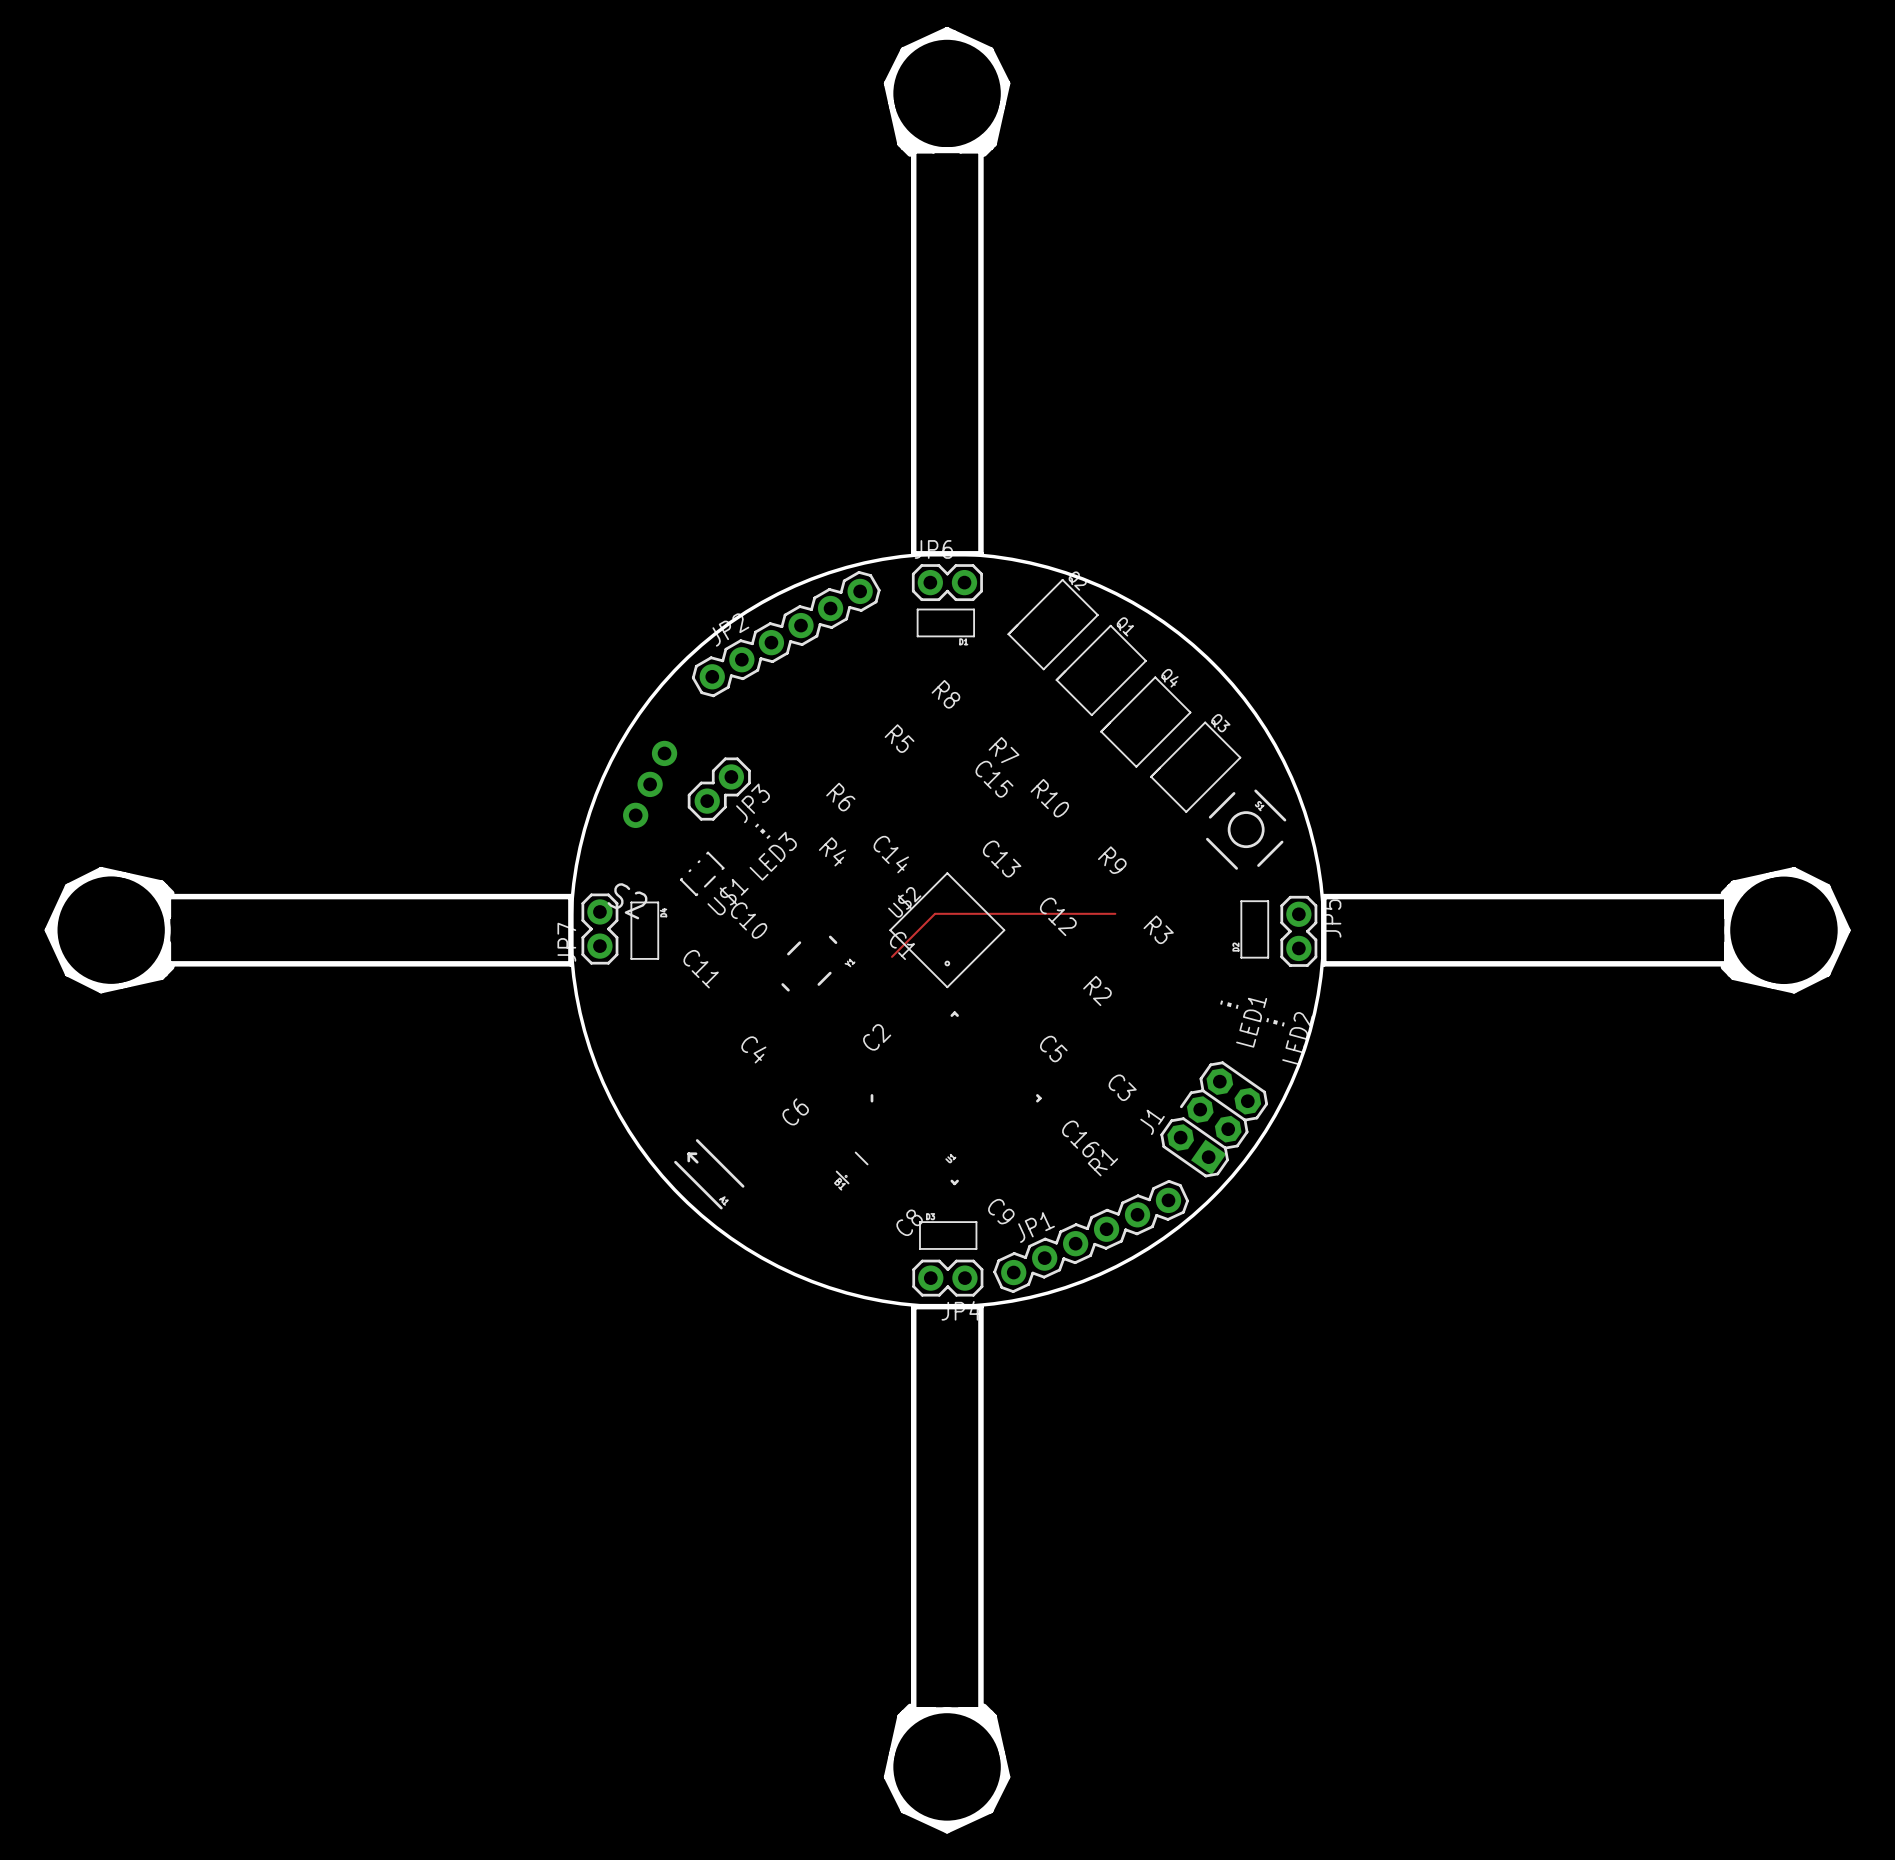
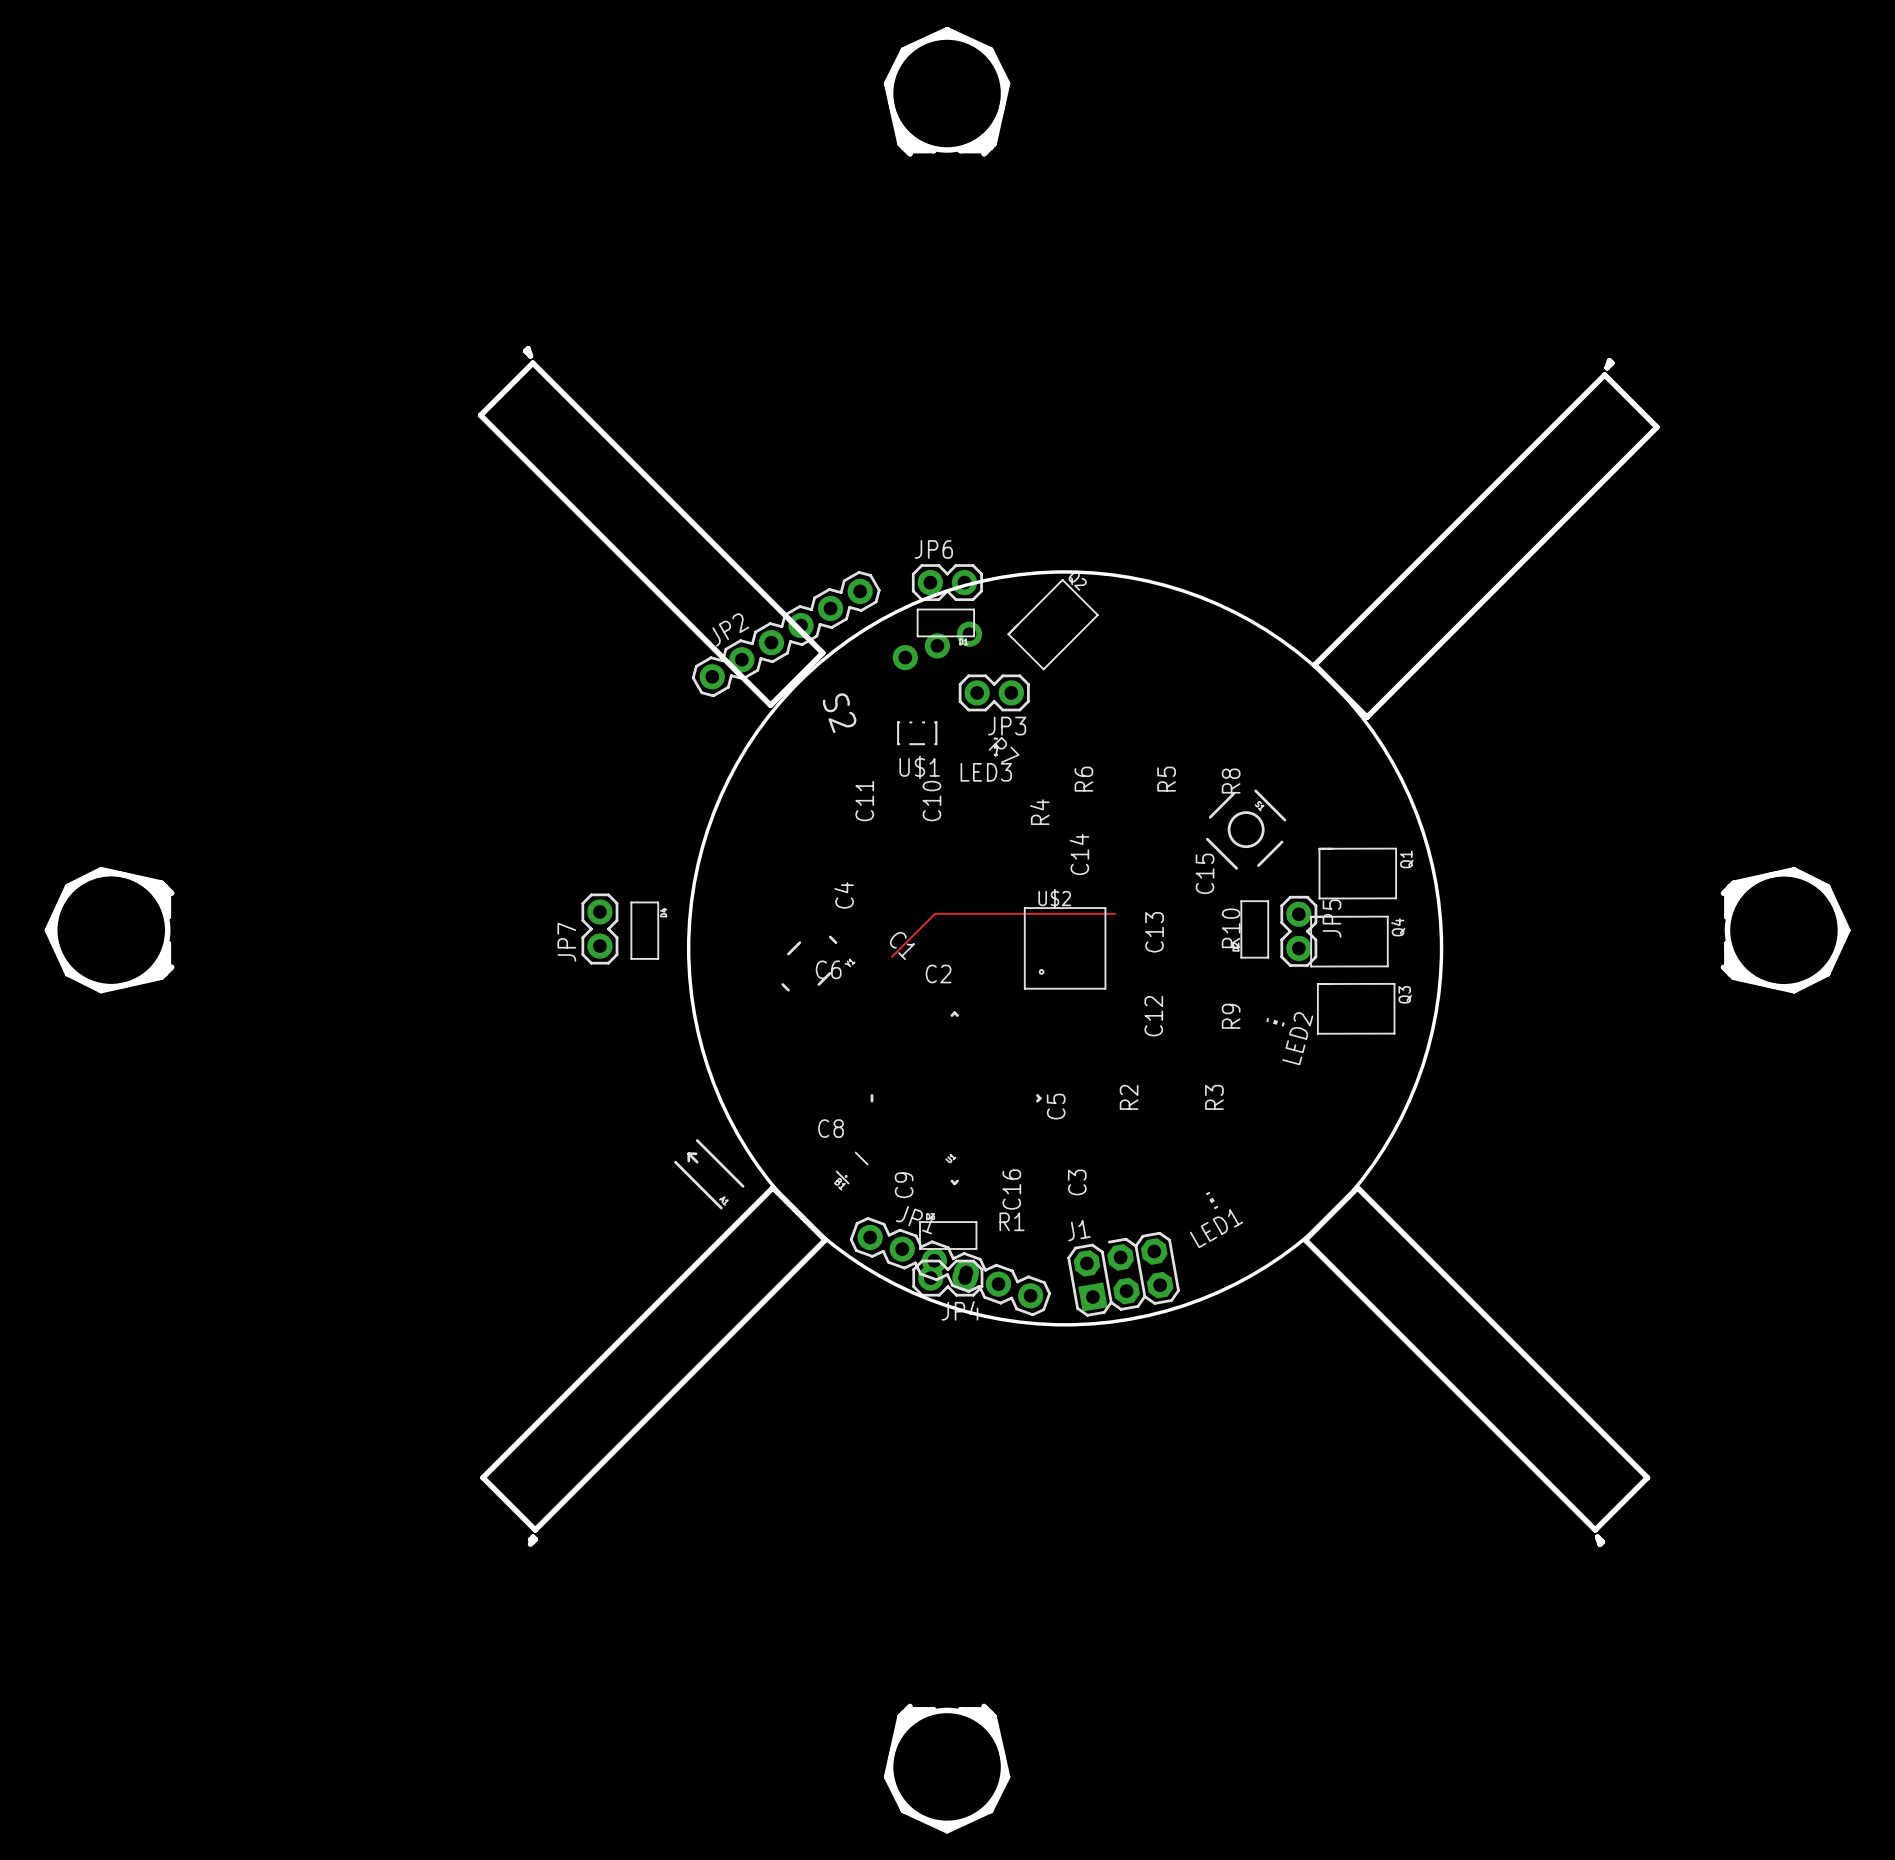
board edge: (913, 150) (913, 553) (980, 553) (980, 150) (913, 150) -> none
board edge: none -> (528, 348) (525, 351) (530, 355) (528, 348)
board edge: none -> (1609, 360) (1611, 363) (1607, 367) (1609, 360)
board edge: none -> (532, 363) (822, 653) (770, 705) (480, 415) (532, 363)
board edge: none -> (1604, 374) (1314, 664) (1367, 717) (1657, 427) (1604, 374)
Q1 rotation: 0° (1101, 670) -> 45° clockwise (1357, 873)
Q1 position: (1101, 670) -> (1357, 873)
R8 position: (945, 694) -> (1231, 781)
R8 name rotation: 0° (945, 694) -> 135° counterclockwise (1231, 781)
Q4 rotation: 0° (1145, 722) -> 45° clockwise (1349, 941)
Q4 position: (1145, 722) -> (1349, 941)
R5 position: (899, 738) -> (1166, 779)
R5 name rotation: 0° (899, 738) -> 135° counterclockwise (1166, 779)
Q3 rotation: 0° (1195, 767) -> 45° clockwise (1356, 1008)
Q3 position: (1195, 767) -> (1356, 1008)
C15 position: (994, 779) -> (1205, 873)
C15 name rotation: 0° (994, 779) -> 135° counterclockwise (1205, 873)
S2 rotation: 0° (650, 784) -> 45° clockwise (937, 645)
S2 position: (650, 784) -> (937, 645)
JP3 rotation: 0° (719, 789) -> 45° clockwise (994, 692)
JP3 position: (719, 789) -> (994, 692)
R6 position: (840, 797) -> (1083, 779)
R6 name rotation: 0° (840, 797) -> 135° counterclockwise (1083, 779)
R10 position: (1049, 798) -> (1231, 928)
R10 name rotation: 0° (1049, 798) -> 135° counterclockwise (1231, 928)
LED3 rotation: 0° (762, 831) -> 45° clockwise (995, 746)
LED3 position: (762, 831) -> (995, 746)
R4 position: (832, 851) -> (1039, 812)
R4 name rotation: 0° (832, 851) -> 135° counterclockwise (1039, 812)
C14 position: (891, 854) -> (1079, 854)
C14 name rotation: 0° (891, 854) -> 135° counterclockwise (1079, 854)
C13: (1002, 859) -> none
R9 position: (1112, 860) -> (1231, 1016)
R9 name rotation: 0° (1112, 860) -> 135° counterclockwise (1231, 1016)
U$1 rotation: 0° (702, 873) -> 45° clockwise (917, 733)
U$1 position: (702, 873) -> (917, 733)
board edge: (167, 896) (167, 963) (570, 963) (570, 896) (167, 896) -> none
board edge: (1323, 896) (1727, 896) (1727, 963) (1323, 963) (1323, 896) -> none
C12 position: (1058, 916) -> (1153, 1016)
C12 name rotation: 0° (1058, 916) -> 135° counterclockwise (1153, 1016)
C10 position: (749, 920) -> (931, 801)
C10 name rotation: 0° (749, 920) -> 135° counterclockwise (931, 801)
R3 name: R3 (1158, 929) -> C13 (1154, 932)
round board edge position: (947, 930) -> (1065, 948)
U$2 rotation: 0° (947, 930) -> 45° clockwise (1065, 948)
U$2 position: (947, 930) -> (1065, 948)
C11 position: (701, 969) -> (864, 801)
C11 name rotation: 0° (701, 969) -> 135° counterclockwise (864, 801)
R2 position: (1097, 990) -> (1129, 1097)
R2 name rotation: 0° (1097, 990) -> 135° counterclockwise (1129, 1097)
LED1 rotation: 0° (1229, 1004) -> 45° clockwise (1212, 1200)
LED1 position: (1229, 1004) -> (1212, 1200)
C2 position: (877, 1037) -> (938, 973)
C2 name rotation: 0° (877, 1037) -> 45° clockwise (938, 973)
C4 position: (753, 1049) -> (844, 895)
C4 name rotation: 0° (753, 1049) -> 135° counterclockwise (844, 895)
C5 position: (1053, 1049) -> (1056, 1106)
C5 name rotation: 0° (1053, 1049) -> 135° counterclockwise (1056, 1106)
C3 position: (1122, 1087) -> (1077, 1182)
C3 name rotation: 0° (1122, 1087) -> 135° counterclockwise (1077, 1182)
R3: none -> (1214, 1097)
C6 position: (795, 1111) -> (828, 969)
C6 name rotation: 0° (795, 1111) -> 45° clockwise (828, 969)
J1 rotation: 0° (1214, 1119) -> 45° clockwise (1123, 1274)
J1 position: (1214, 1119) -> (1123, 1274)
C16 position: (1080, 1139) -> (1011, 1189)
C16 name rotation: 0° (1080, 1139) -> 135° counterclockwise (1011, 1189)
R1 position: (1102, 1162) -> (1011, 1221)
R1 name rotation: 0° (1102, 1162) -> 45° clockwise (1011, 1221)
board edge: none -> (772, 1187) (825, 1240) (535, 1529) (482, 1477) (772, 1187)
board edge: none -> (1357, 1187) (1305, 1240) (1595, 1529) (1647, 1477) (1357, 1187)
C9 position: (1001, 1211) -> (904, 1185)
C9 name rotation: 0° (1001, 1211) -> 135° counterclockwise (904, 1185)
C8 position: (909, 1222) -> (831, 1128)
C8 name rotation: 0° (909, 1222) -> 45° clockwise (831, 1128)
JP1 rotation: 0° (1091, 1236) -> 45° clockwise (950, 1266)
JP1 position: (1091, 1236) -> (950, 1266)
board edge: (913, 1306) (913, 1709) (980, 1709) (980, 1306) (913, 1306) -> none
board edge: none -> (1597, 1537) (1602, 1541) (1599, 1544) (1597, 1537)
board edge: none -> (530, 1539) (532, 1541) (535, 1539) (532, 1537) (530, 1544)

